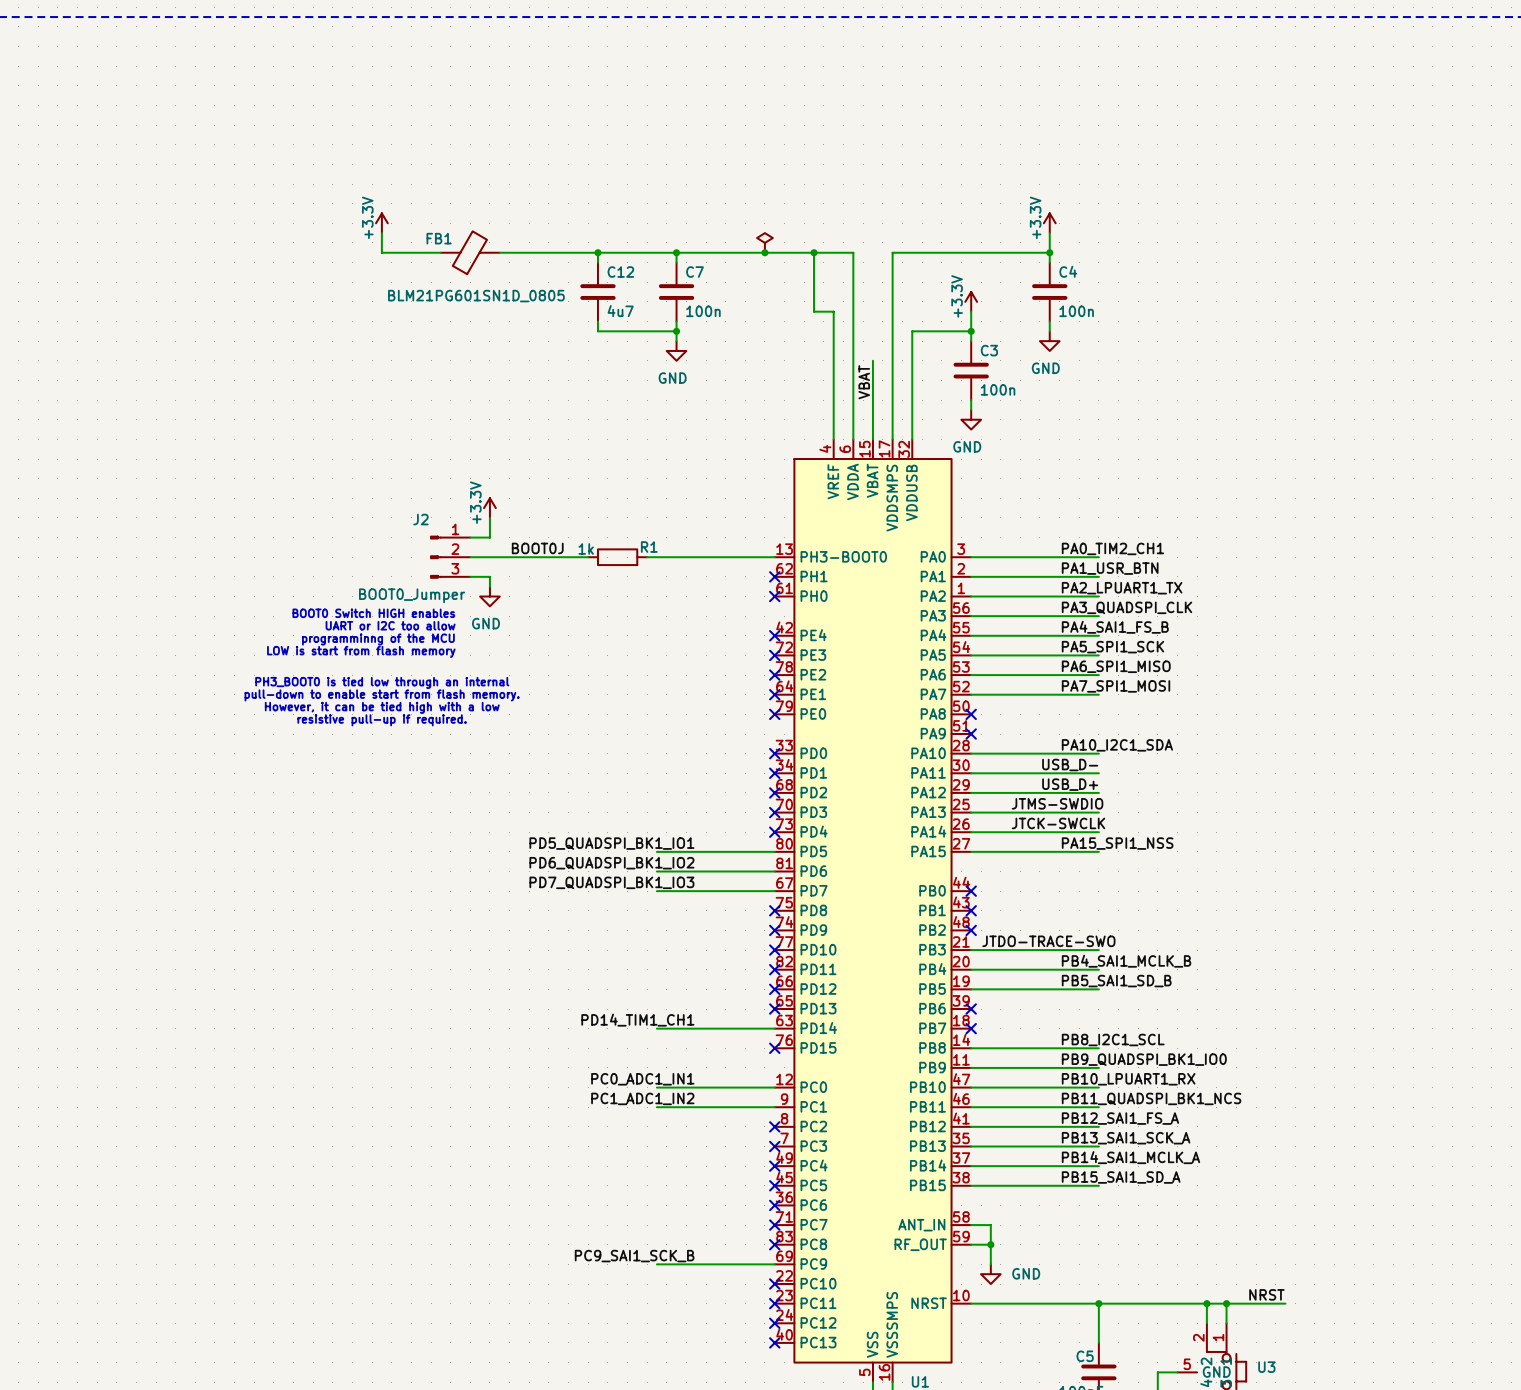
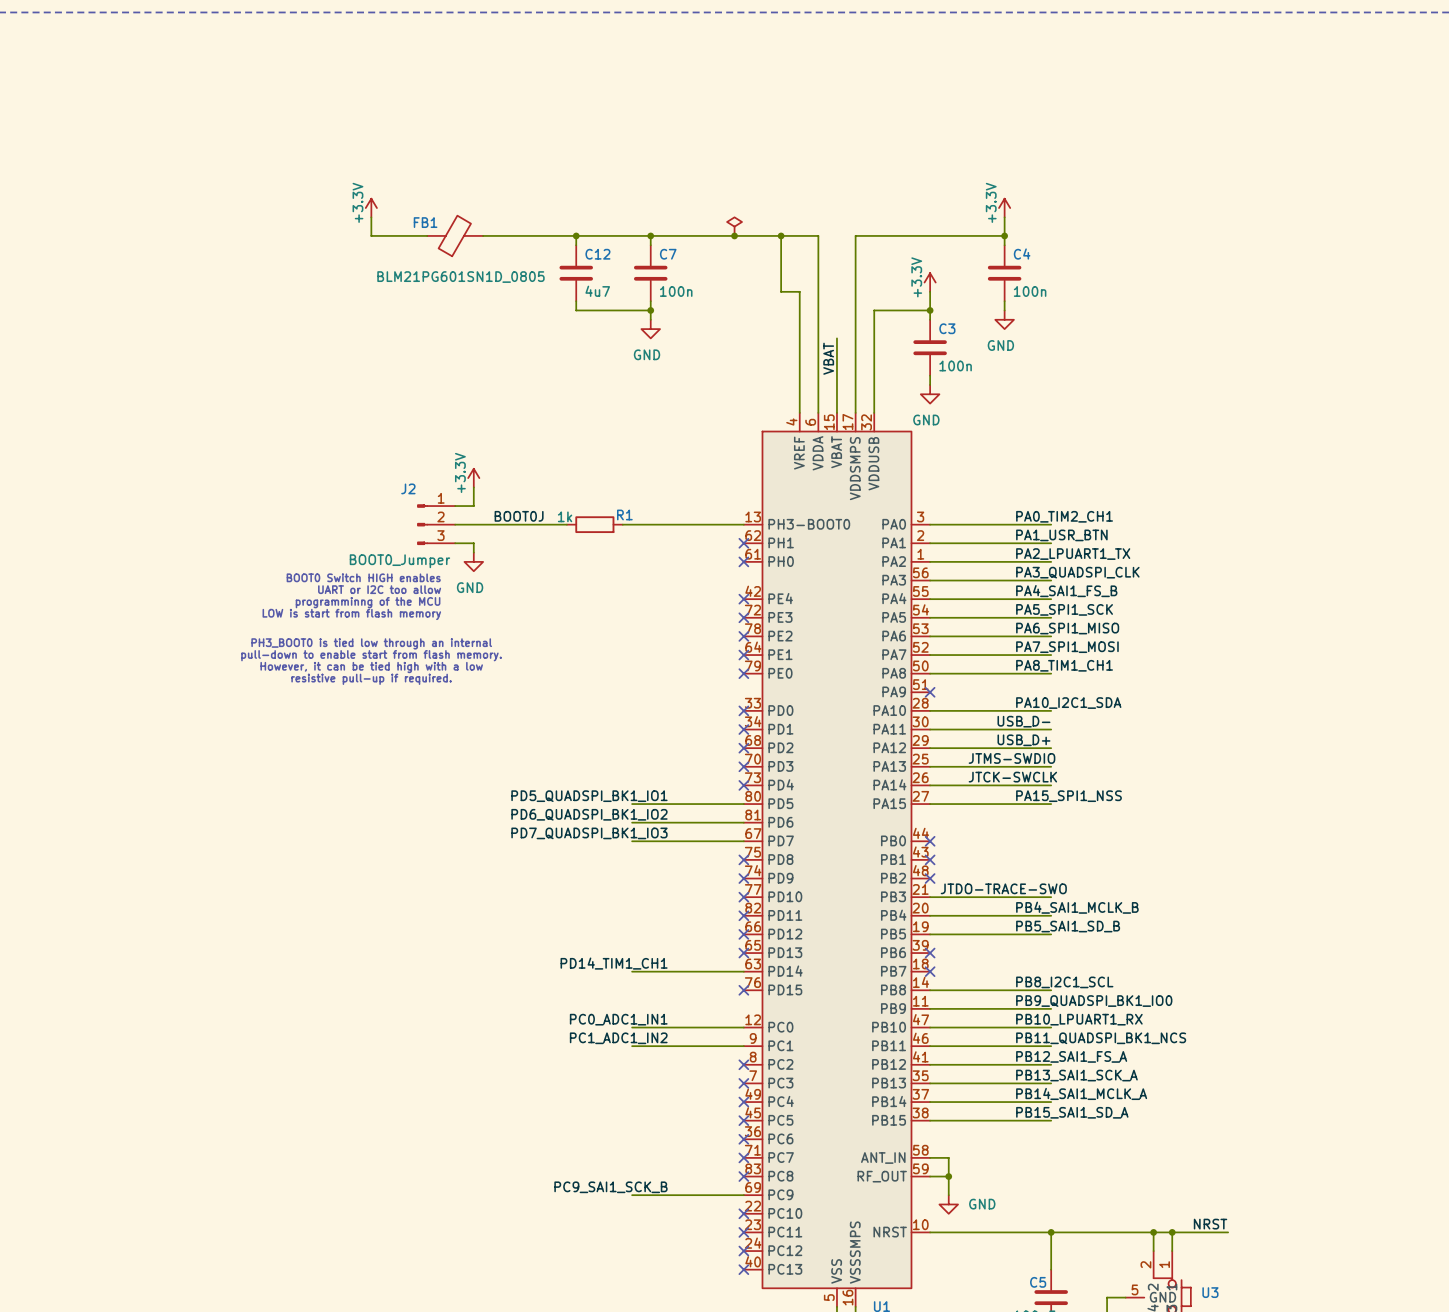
label: none -> PA8_TIM1_CH1 (1064, 665)
wire: none -> (930, 673) (1051, 673)
no-connect mark: (971, 714) -> none

